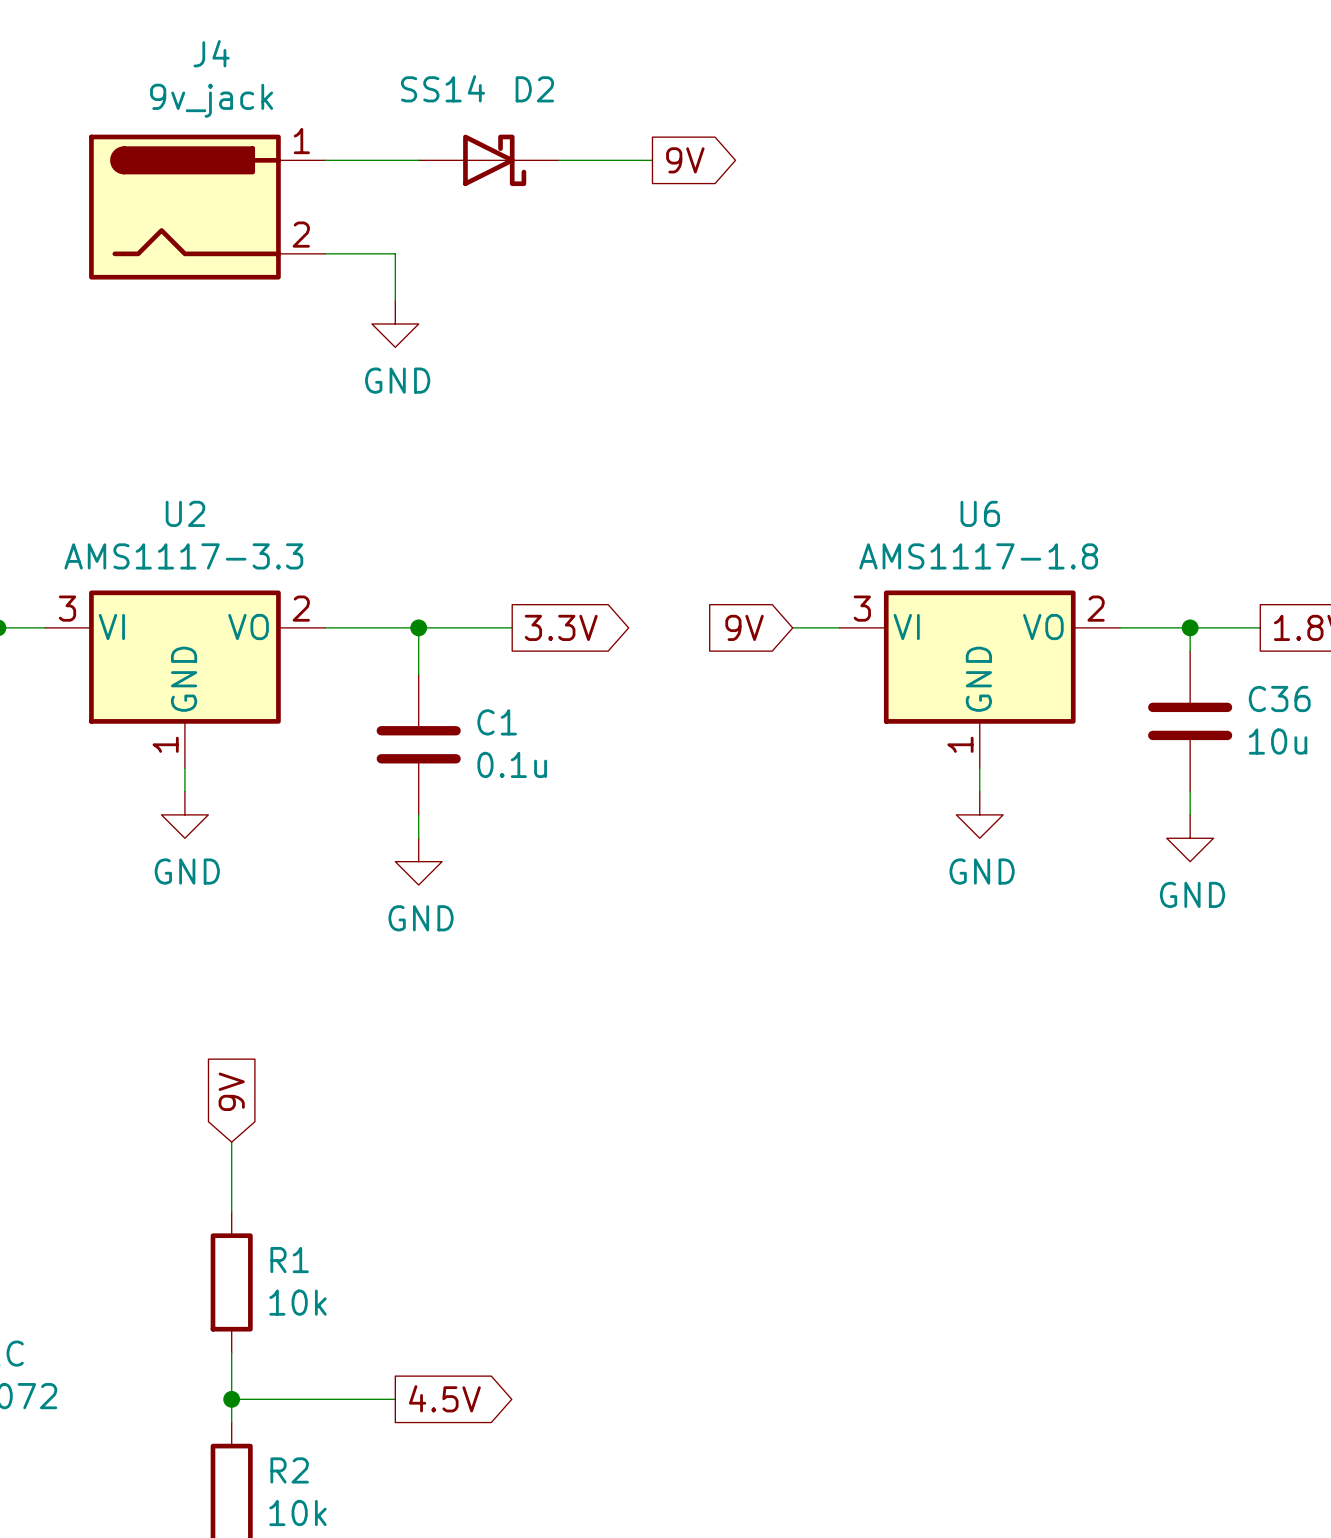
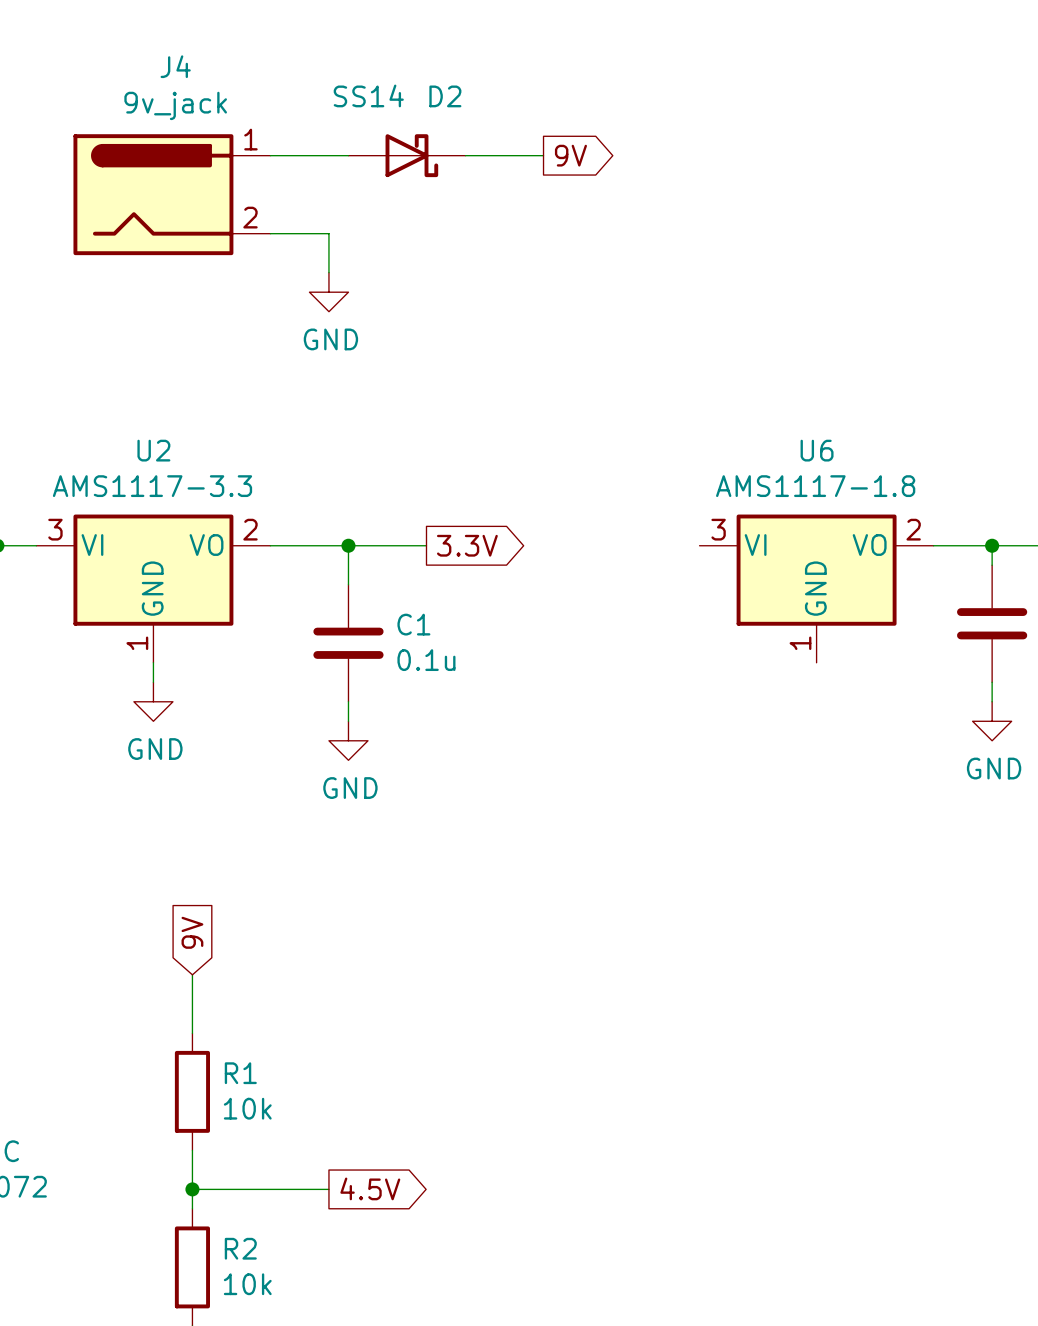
global label: 9V (744, 627) -> none
wire: (792, 627) (839, 627) -> none
wire: (979, 768) (979, 791) -> none
power symbol: GND (979, 814) -> none

